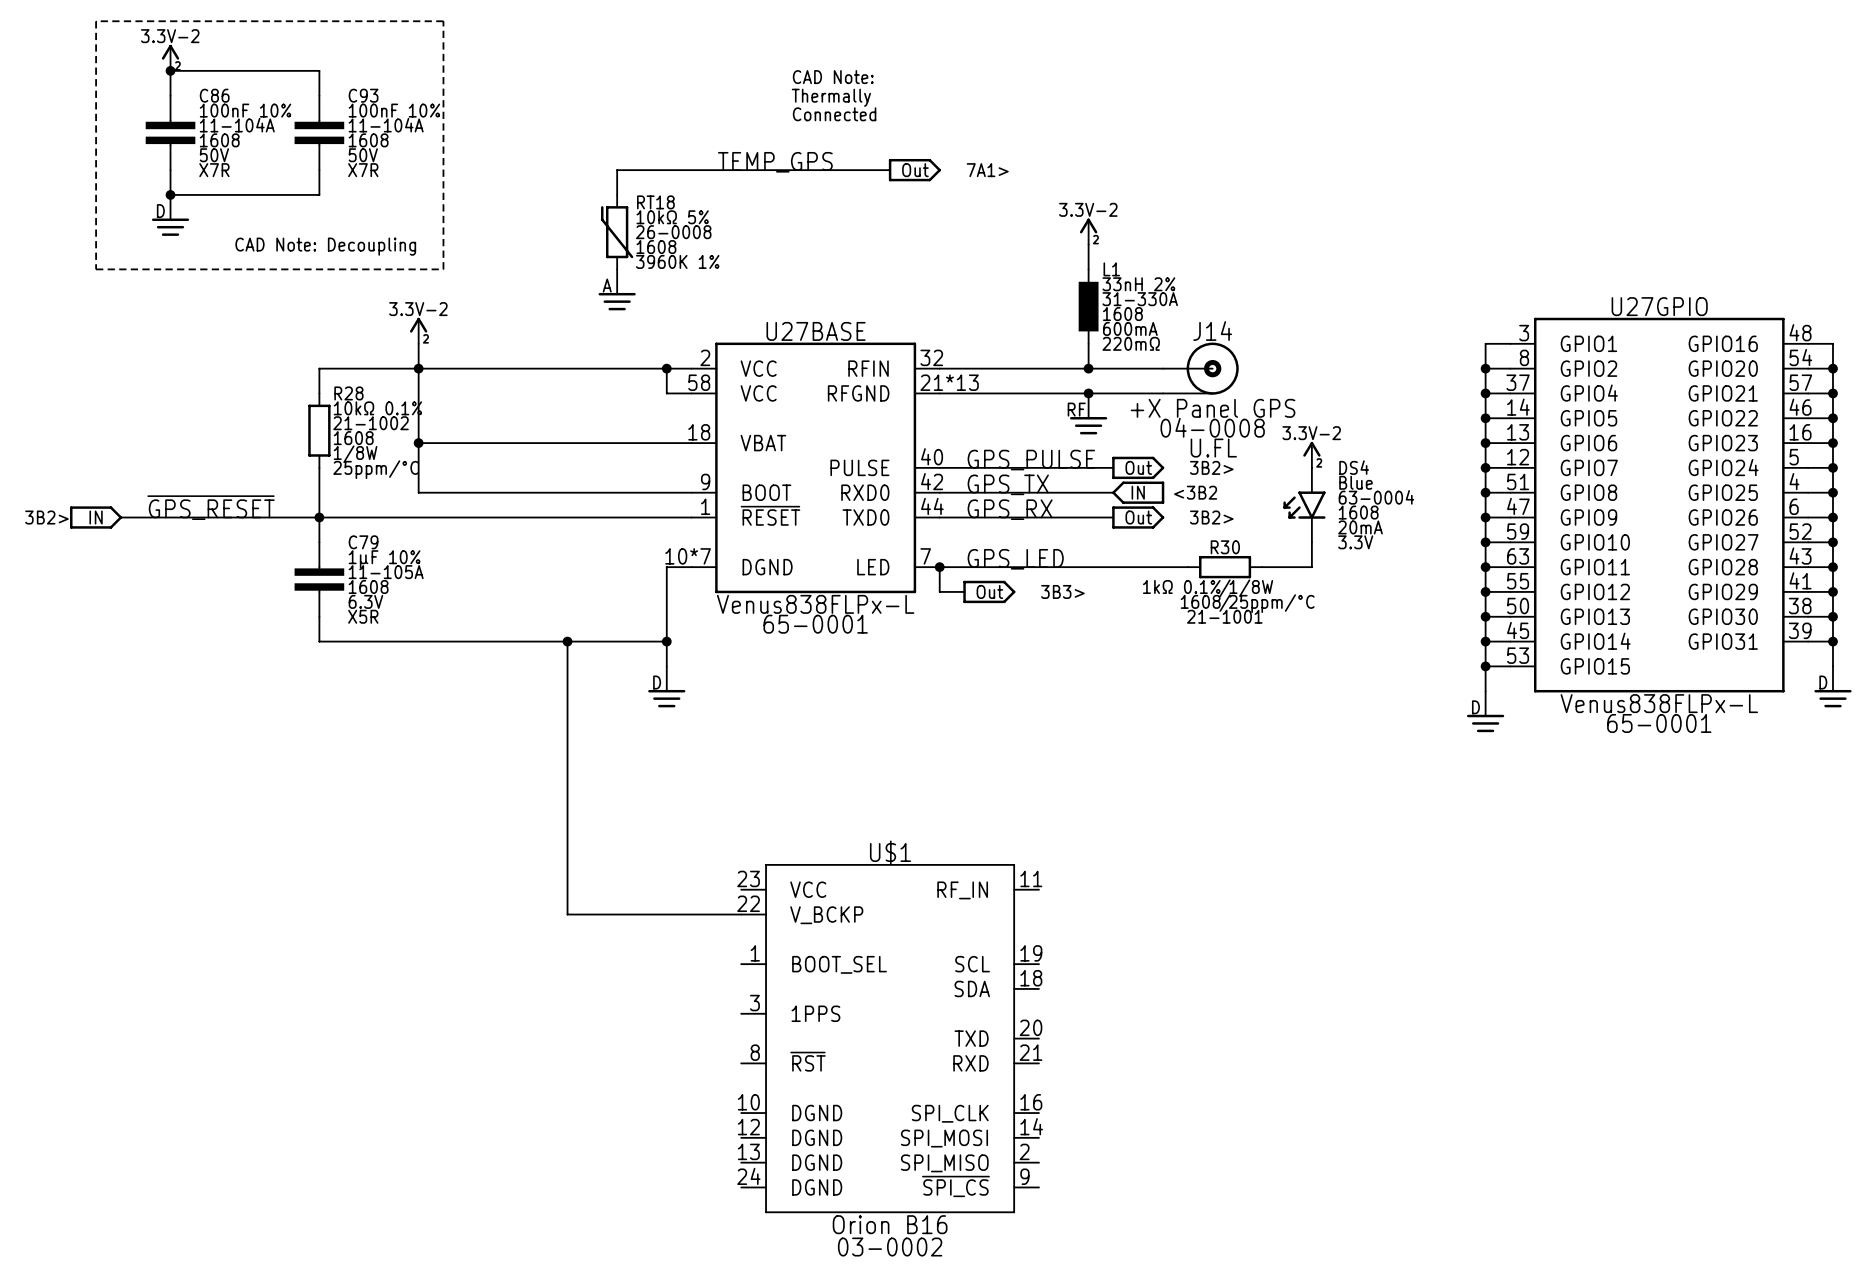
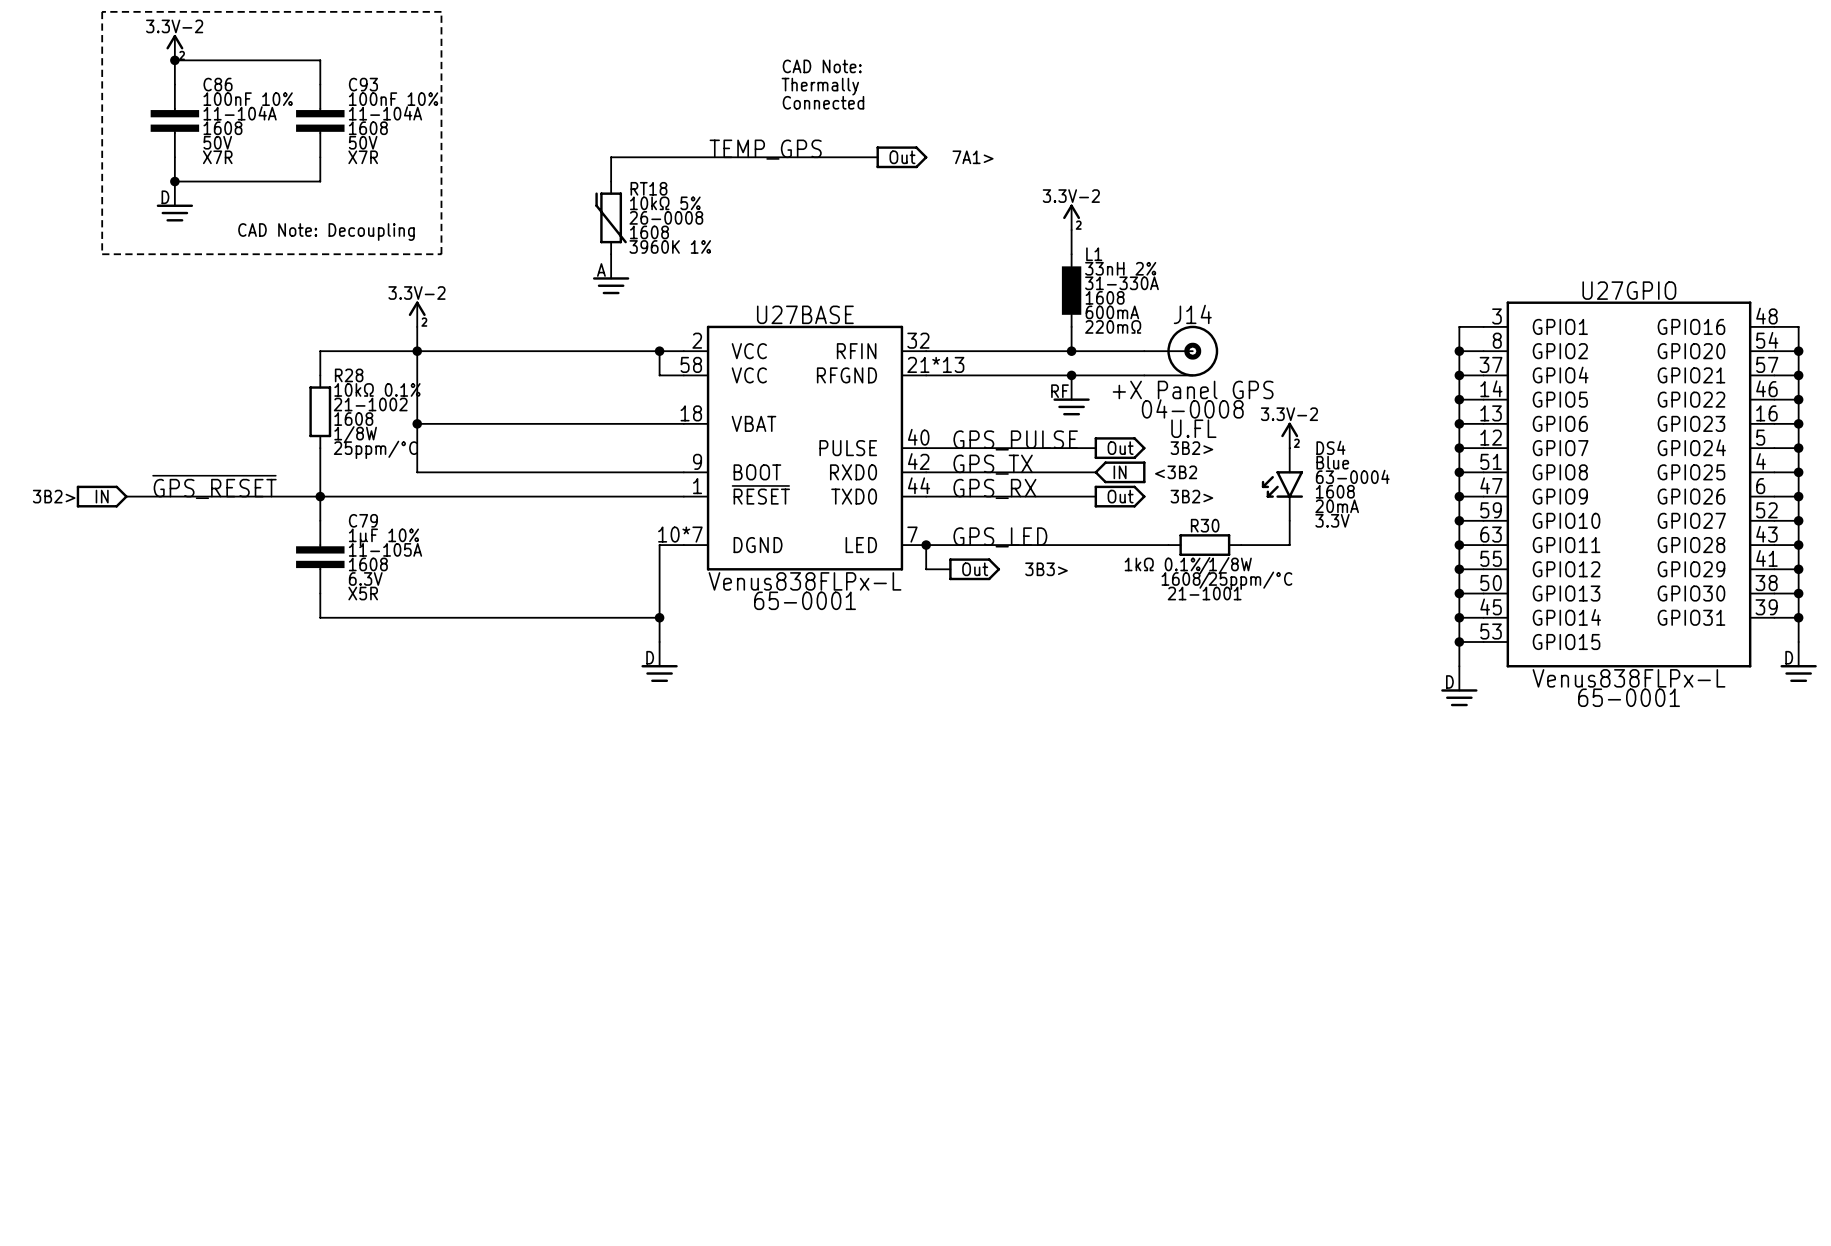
wire: (567, 641) (567, 914) (741, 914) -> none
junction: (567, 641) -> none
U$1: Orion B16 (890, 1038) -> none

